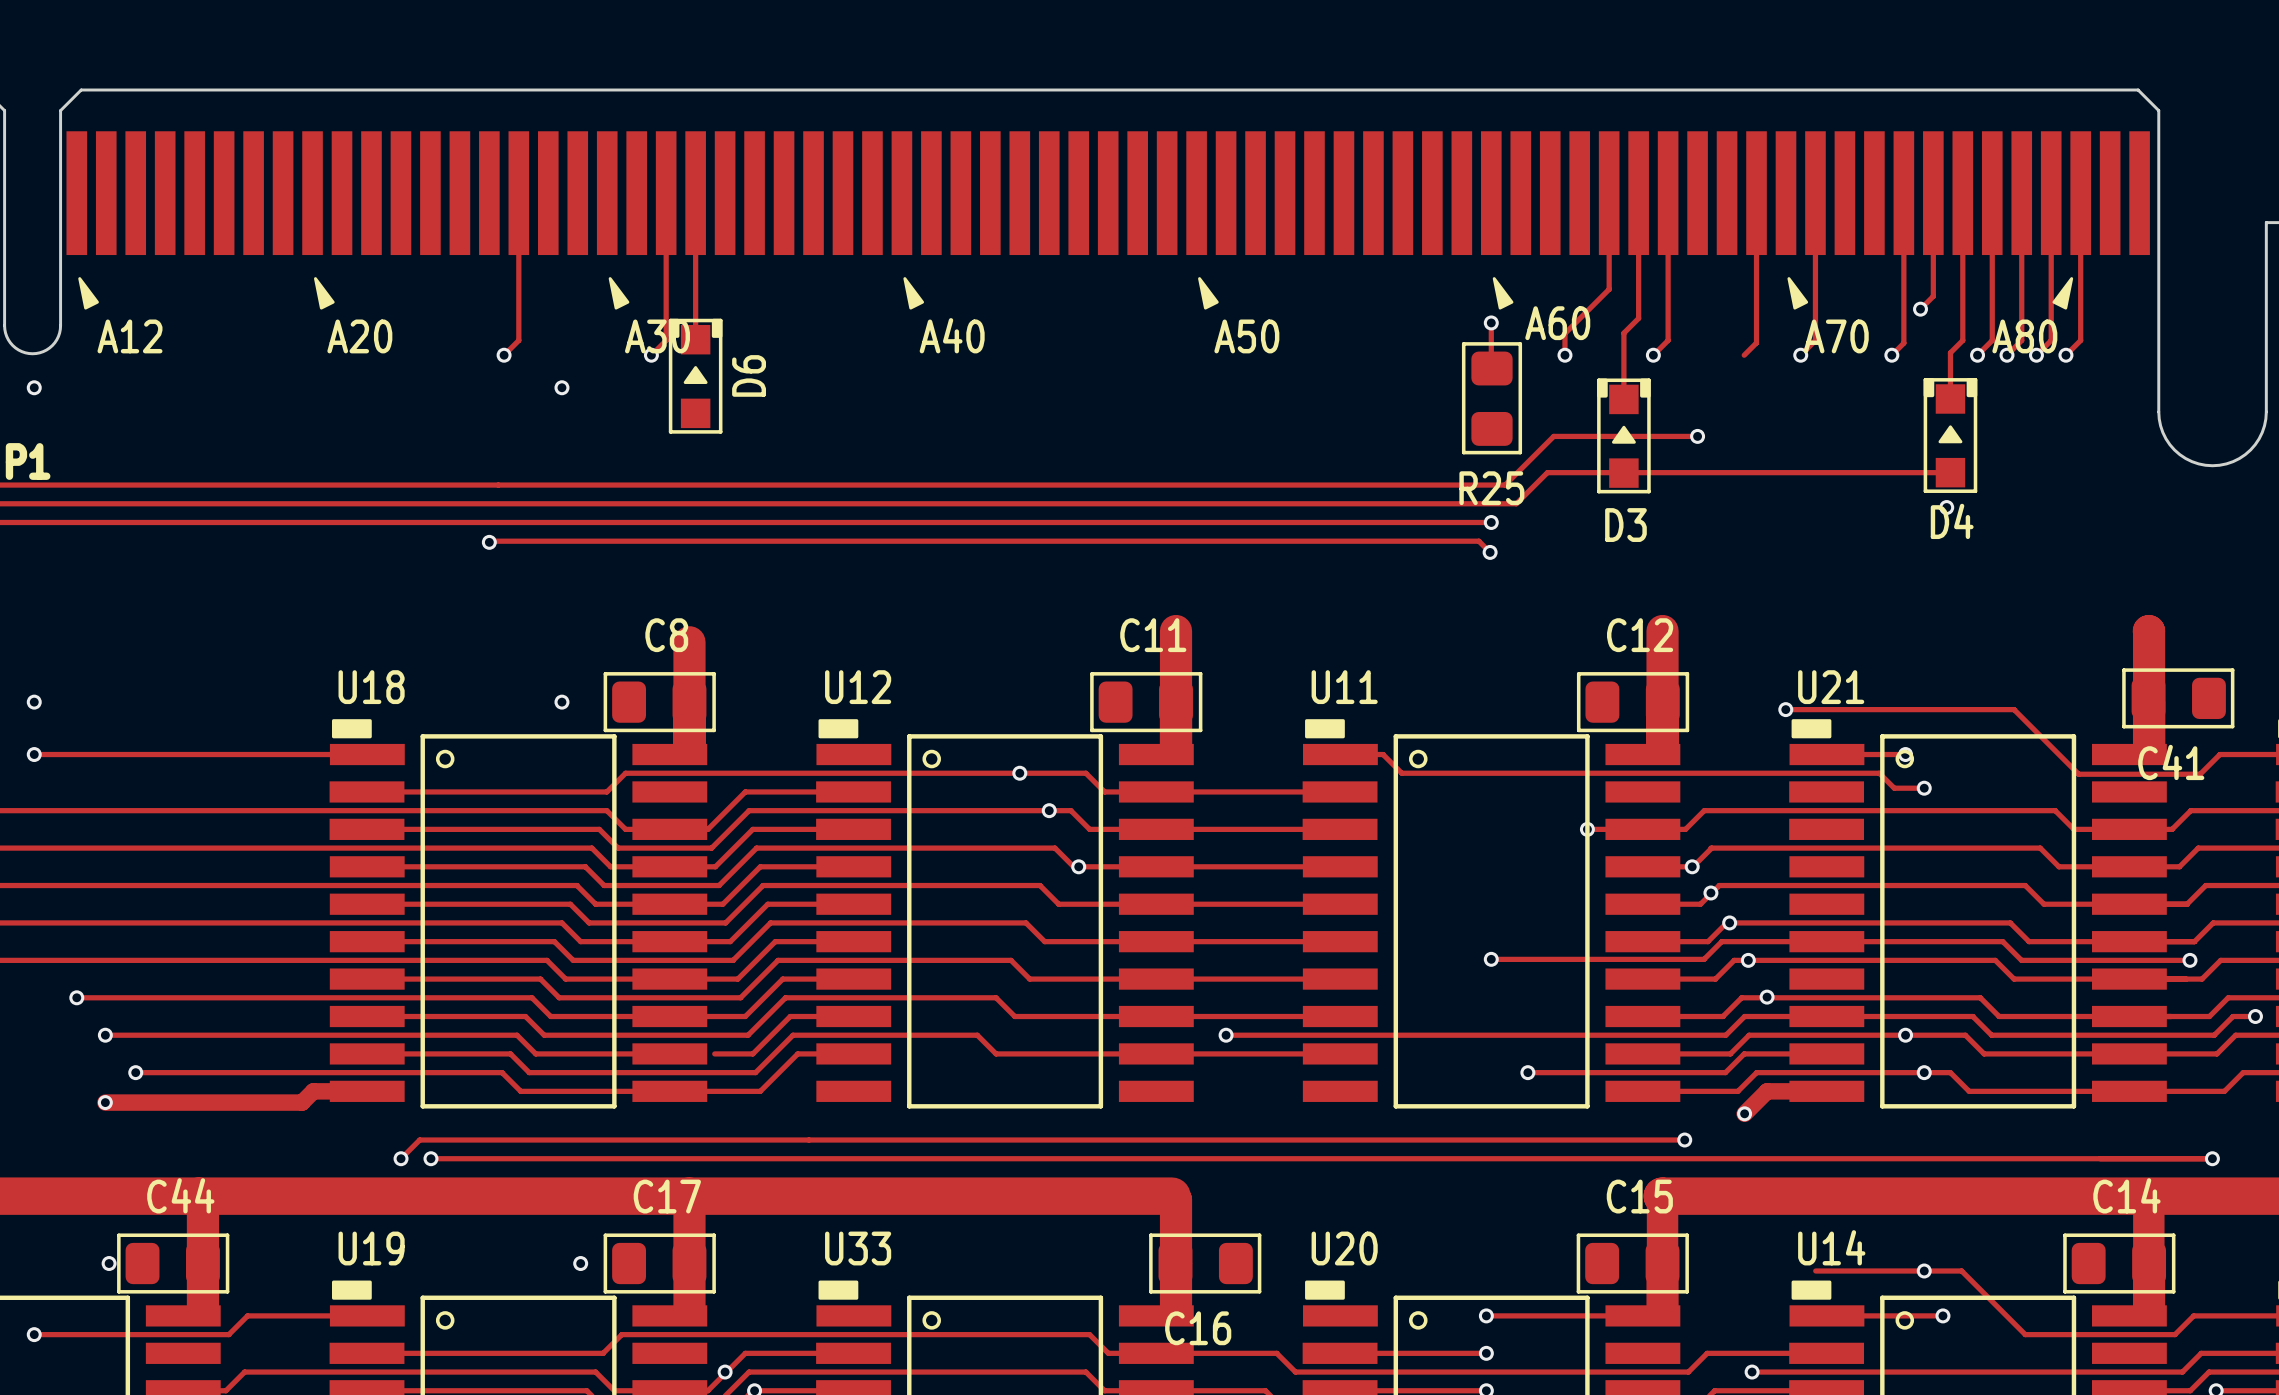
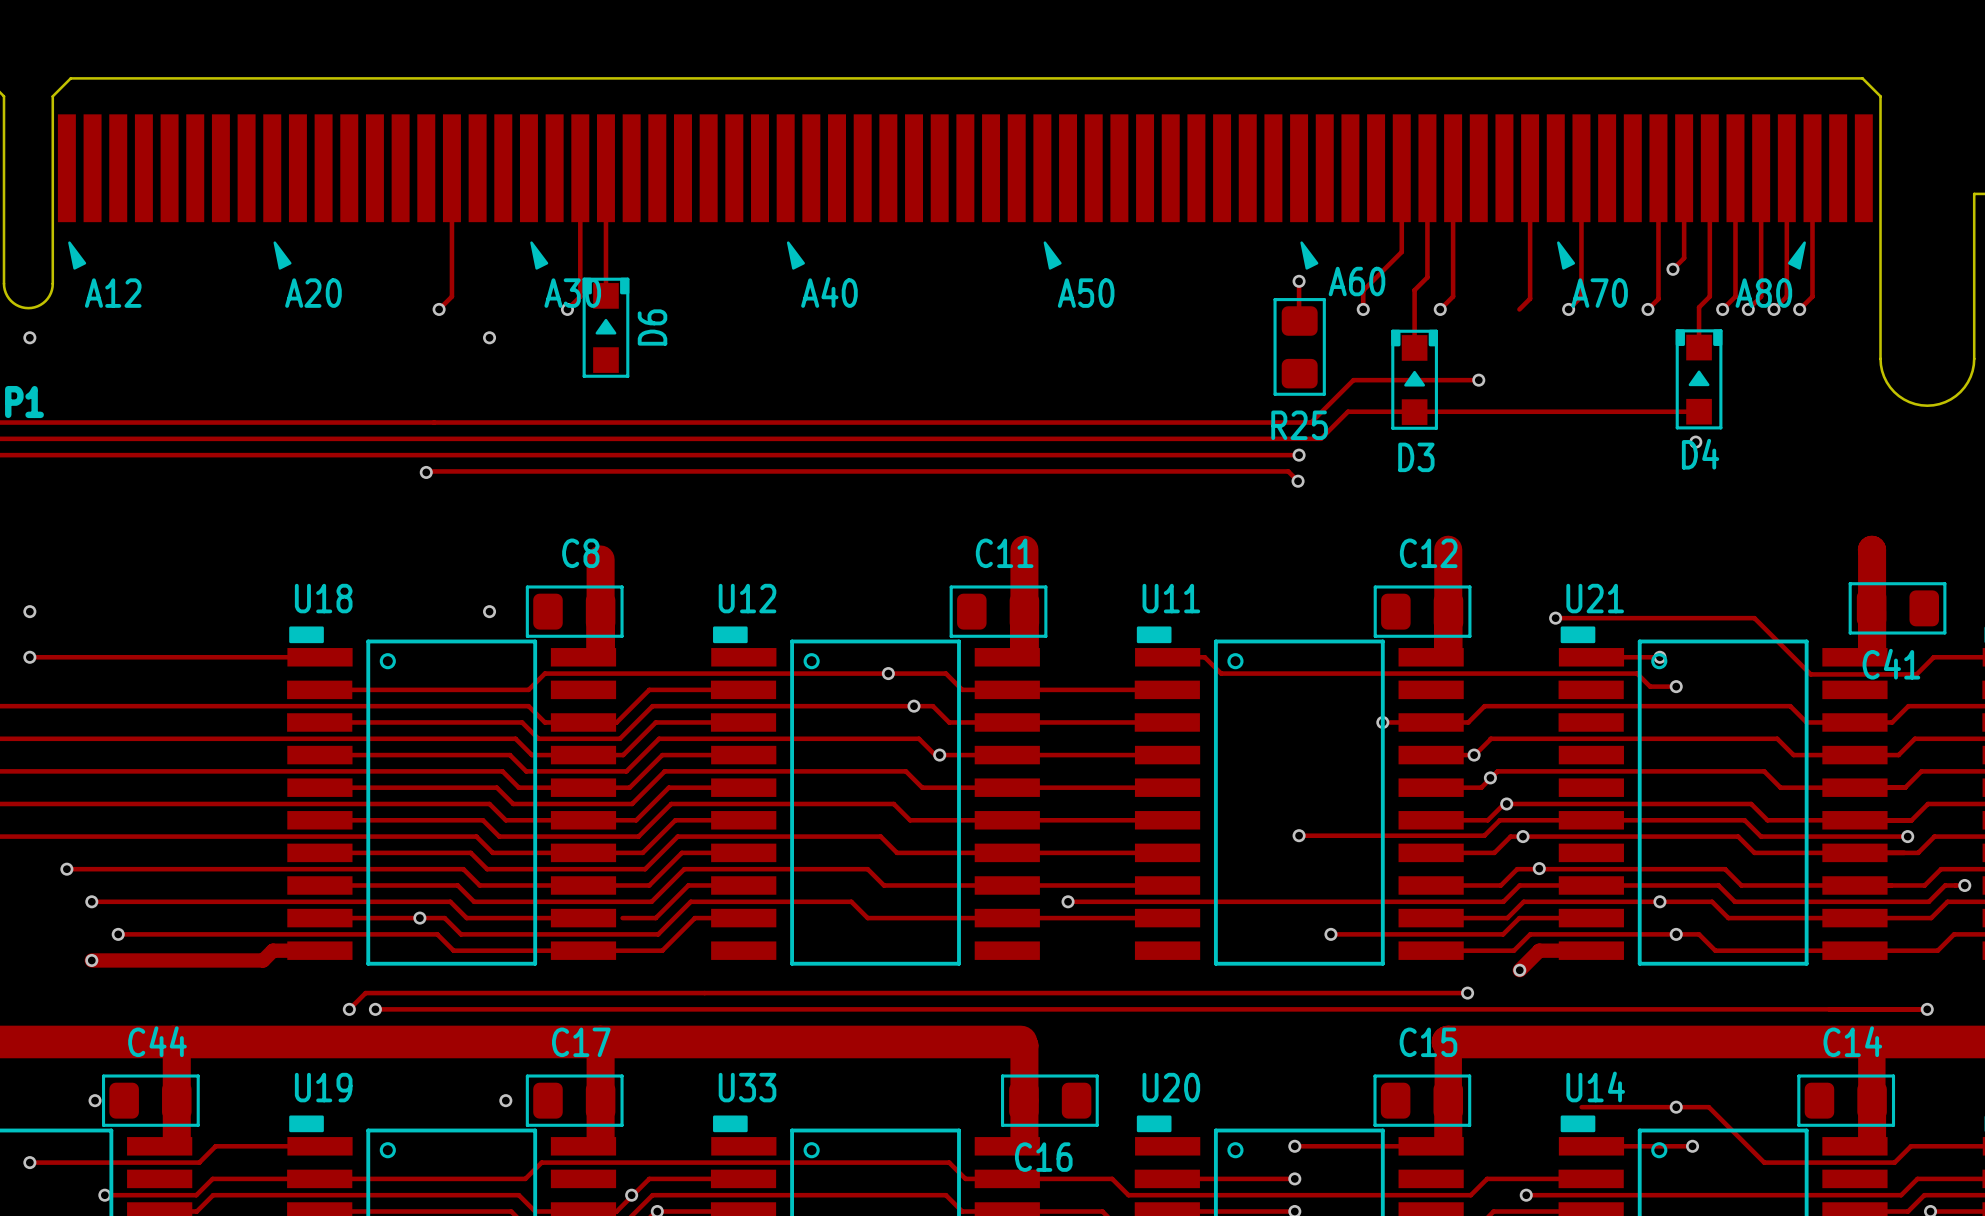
via: none -> (419, 918)
track: none -> (319, 1178) (212, 1178) (196, 1195) (104, 1195)
via: none -> (104, 1195)

